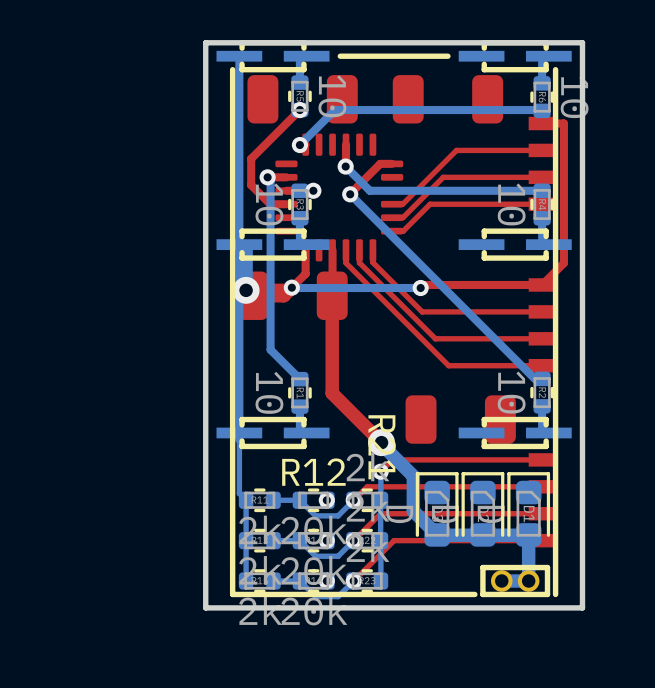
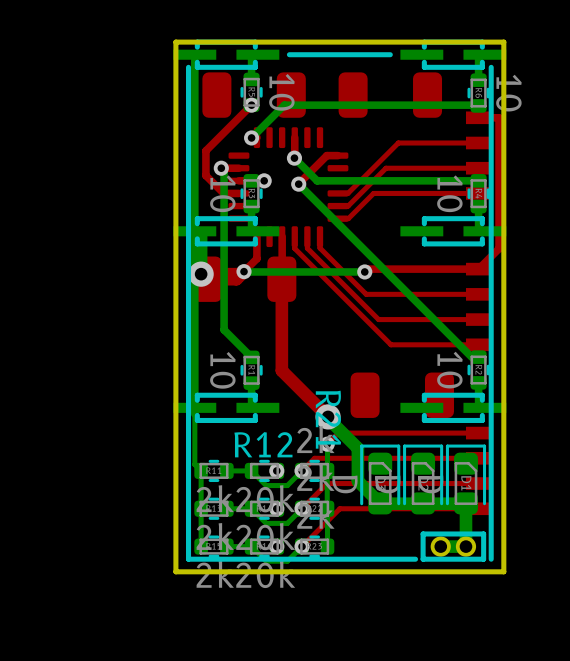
board edge: (219, 42) (205, 42) (205, 607) (219, 607) -> (175, 42) (175, 571)
board edge: (569, 42) (582, 42) (582, 607) (569, 607) -> (503, 42) (503, 571)

